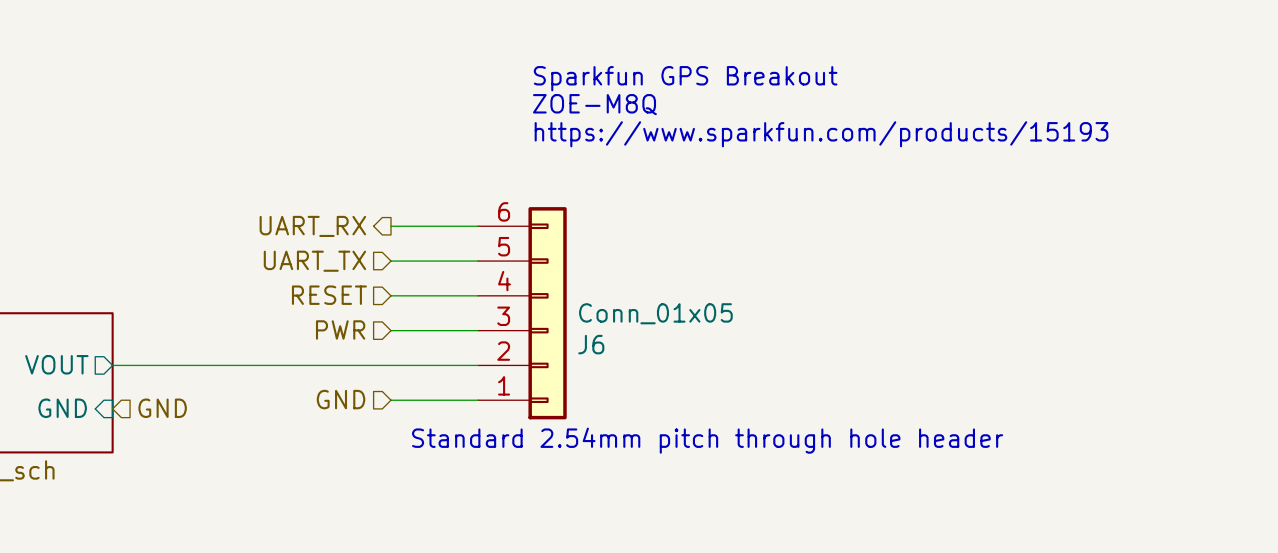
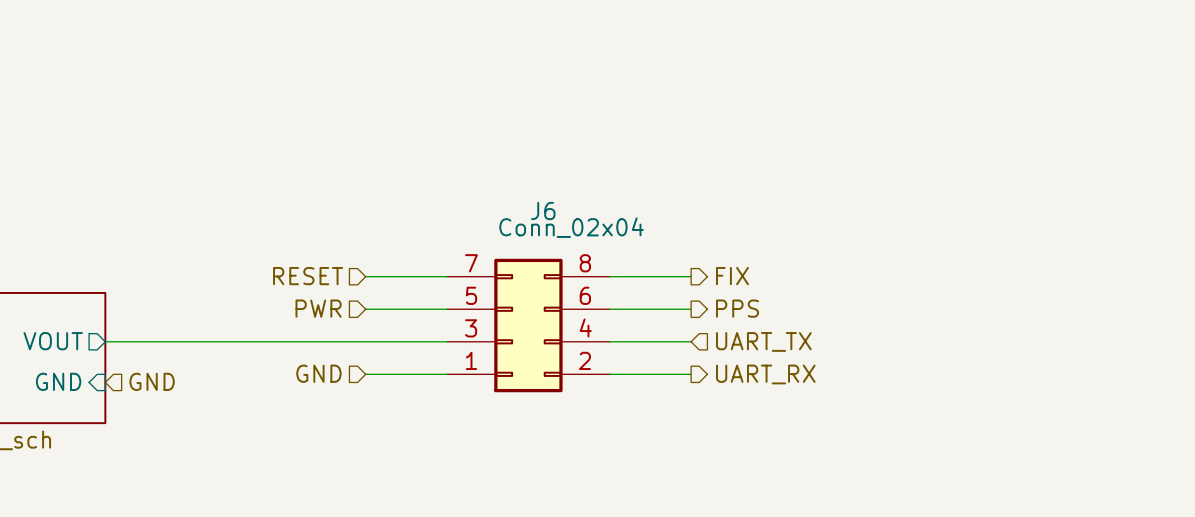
text: Sparkfun GPS Breakout (685, 78) -> none
text: ZOE-M8Q (594, 104) -> none
text: https://www.sparkfun.com/products/15193 (821, 134) -> none
J6 symbol: [477, 207, 567, 420] -> [447, 258, 610, 393]
hierarchical label: UART_RX (312, 226) -> none
wire: (391, 226) (477, 226) -> (609, 276) (691, 276)
hierarchical label: UART_TX (314, 261) -> none
wire: (391, 261) (477, 261) -> (609, 309) (691, 309)
hierarchical label: none -> FIX (732, 276)
J6 value: Conn_01x05 (655, 313) -> Conn_02x04 (571, 227)
hierarchical label: none -> PPS (737, 308)
J6 name position: J6 (591, 344) -> J6 (543, 211)
wire: none -> (609, 341) (691, 341)
hierarchical label: none -> UART_TX (763, 341)
wire: none -> (609, 374) (691, 374)
hierarchical label: none -> UART_RX (765, 374)
text: Standard 2.54mm pitch through hole header (707, 440) -> none

